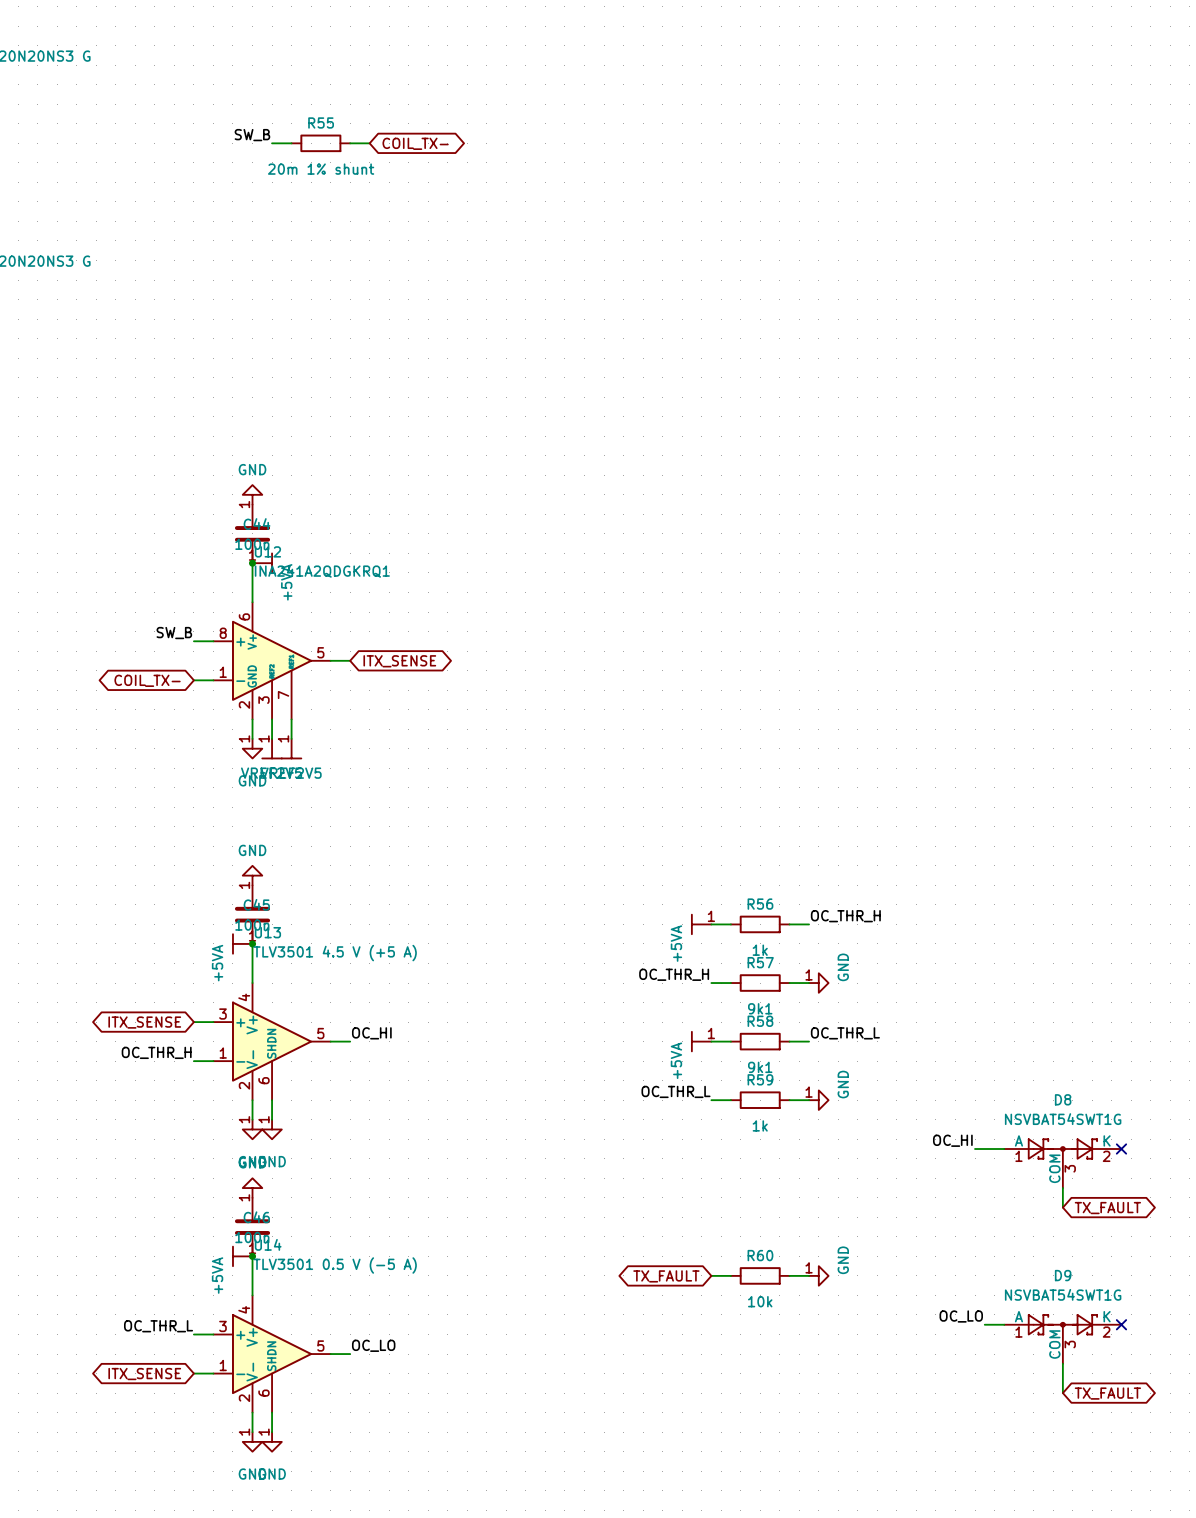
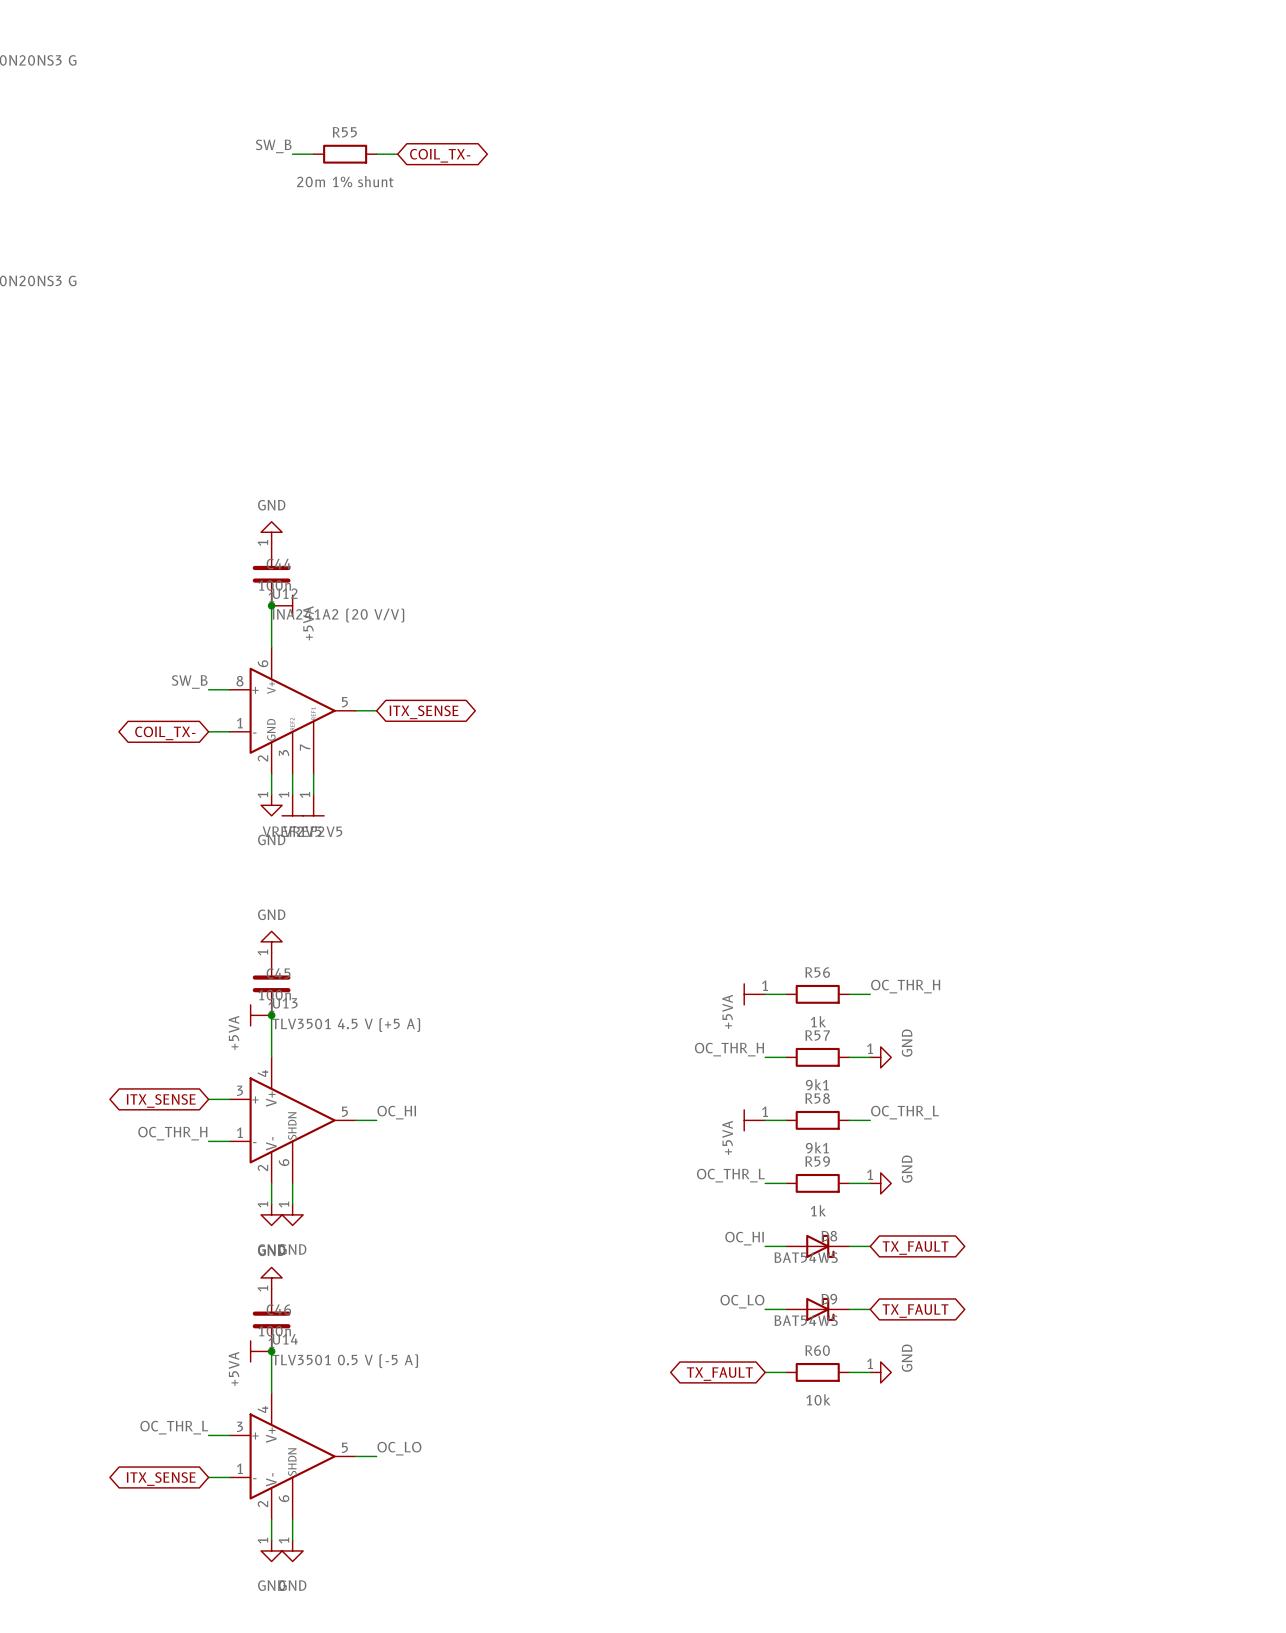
U12 value: INA241A2QDGKRQ1 (322, 571) -> INA241A2 (20 V/V) (338, 615)
D8 name position: D8 (1063, 1099) -> D8 (829, 1236)
D8 value: NSVBAT54SWT1G (1063, 1119) -> BAT54WS (806, 1257)
D8 symbol: [1004, 1139, 1122, 1189] -> [786, 1234, 850, 1258]
label: OC_HI (952, 1140) -> none
wire: (975, 1149) (1004, 1149) -> none
no-connect mark: (1121, 1149) -> none
label: none -> OC_HI (744, 1238)
wire: none -> (765, 1246) (786, 1246)
wire: none -> (849, 1246) (870, 1246)
global label: none -> TX_FAULT (915, 1247)
wire: (1062, 1188) (1062, 1207) -> none
global label: TX_FAULT (1107, 1208) -> none
label: none -> OC_LO (742, 1301)
wire: none -> (765, 1309) (786, 1309)
wire: none -> (849, 1309) (870, 1309)
global label: none -> TX_FAULT (915, 1311)
D9 name position: D9 (1063, 1275) -> D9 (829, 1299)
D9 value: NSVBAT54SWT1G (1063, 1294) -> BAT54WS (806, 1320)
D9 symbol: [1004, 1314, 1122, 1364] -> [786, 1297, 850, 1321]
label: OC_LO (961, 1316) -> none
wire: (984, 1324) (1004, 1324) -> none
no-connect mark: (1121, 1324) -> none
wire: (1062, 1363) (1062, 1393) -> none
global label: TX_FAULT (1107, 1393) -> none

